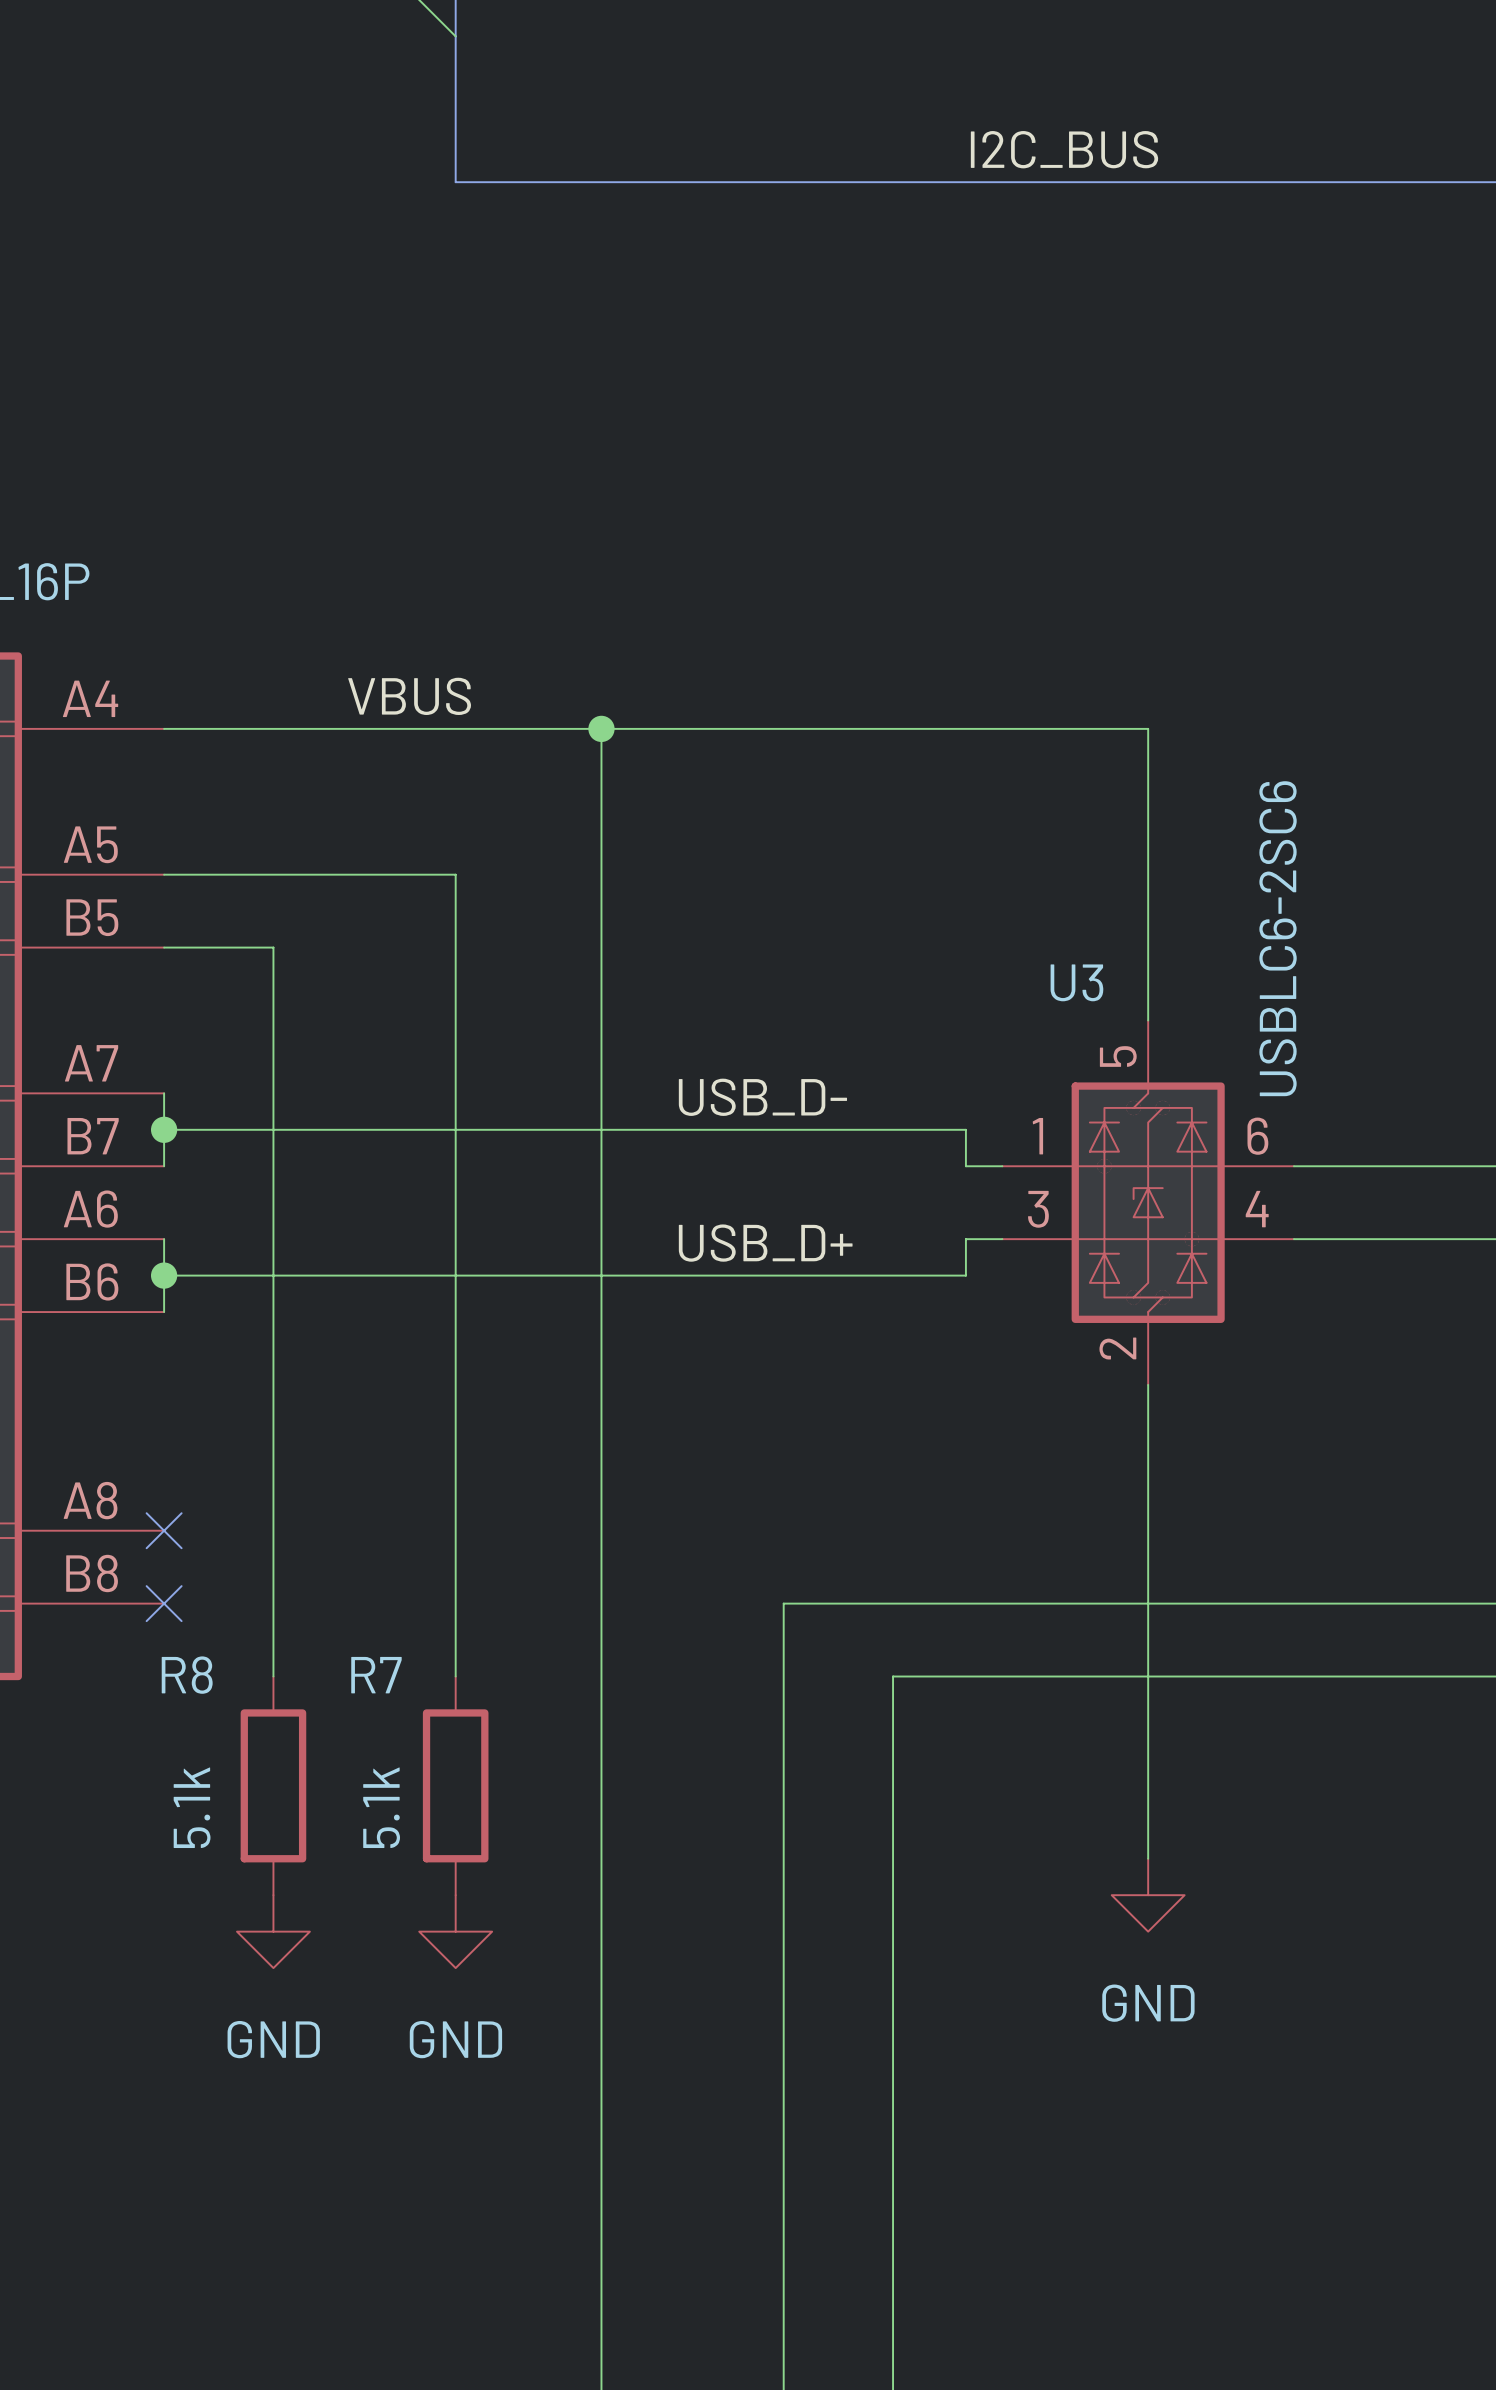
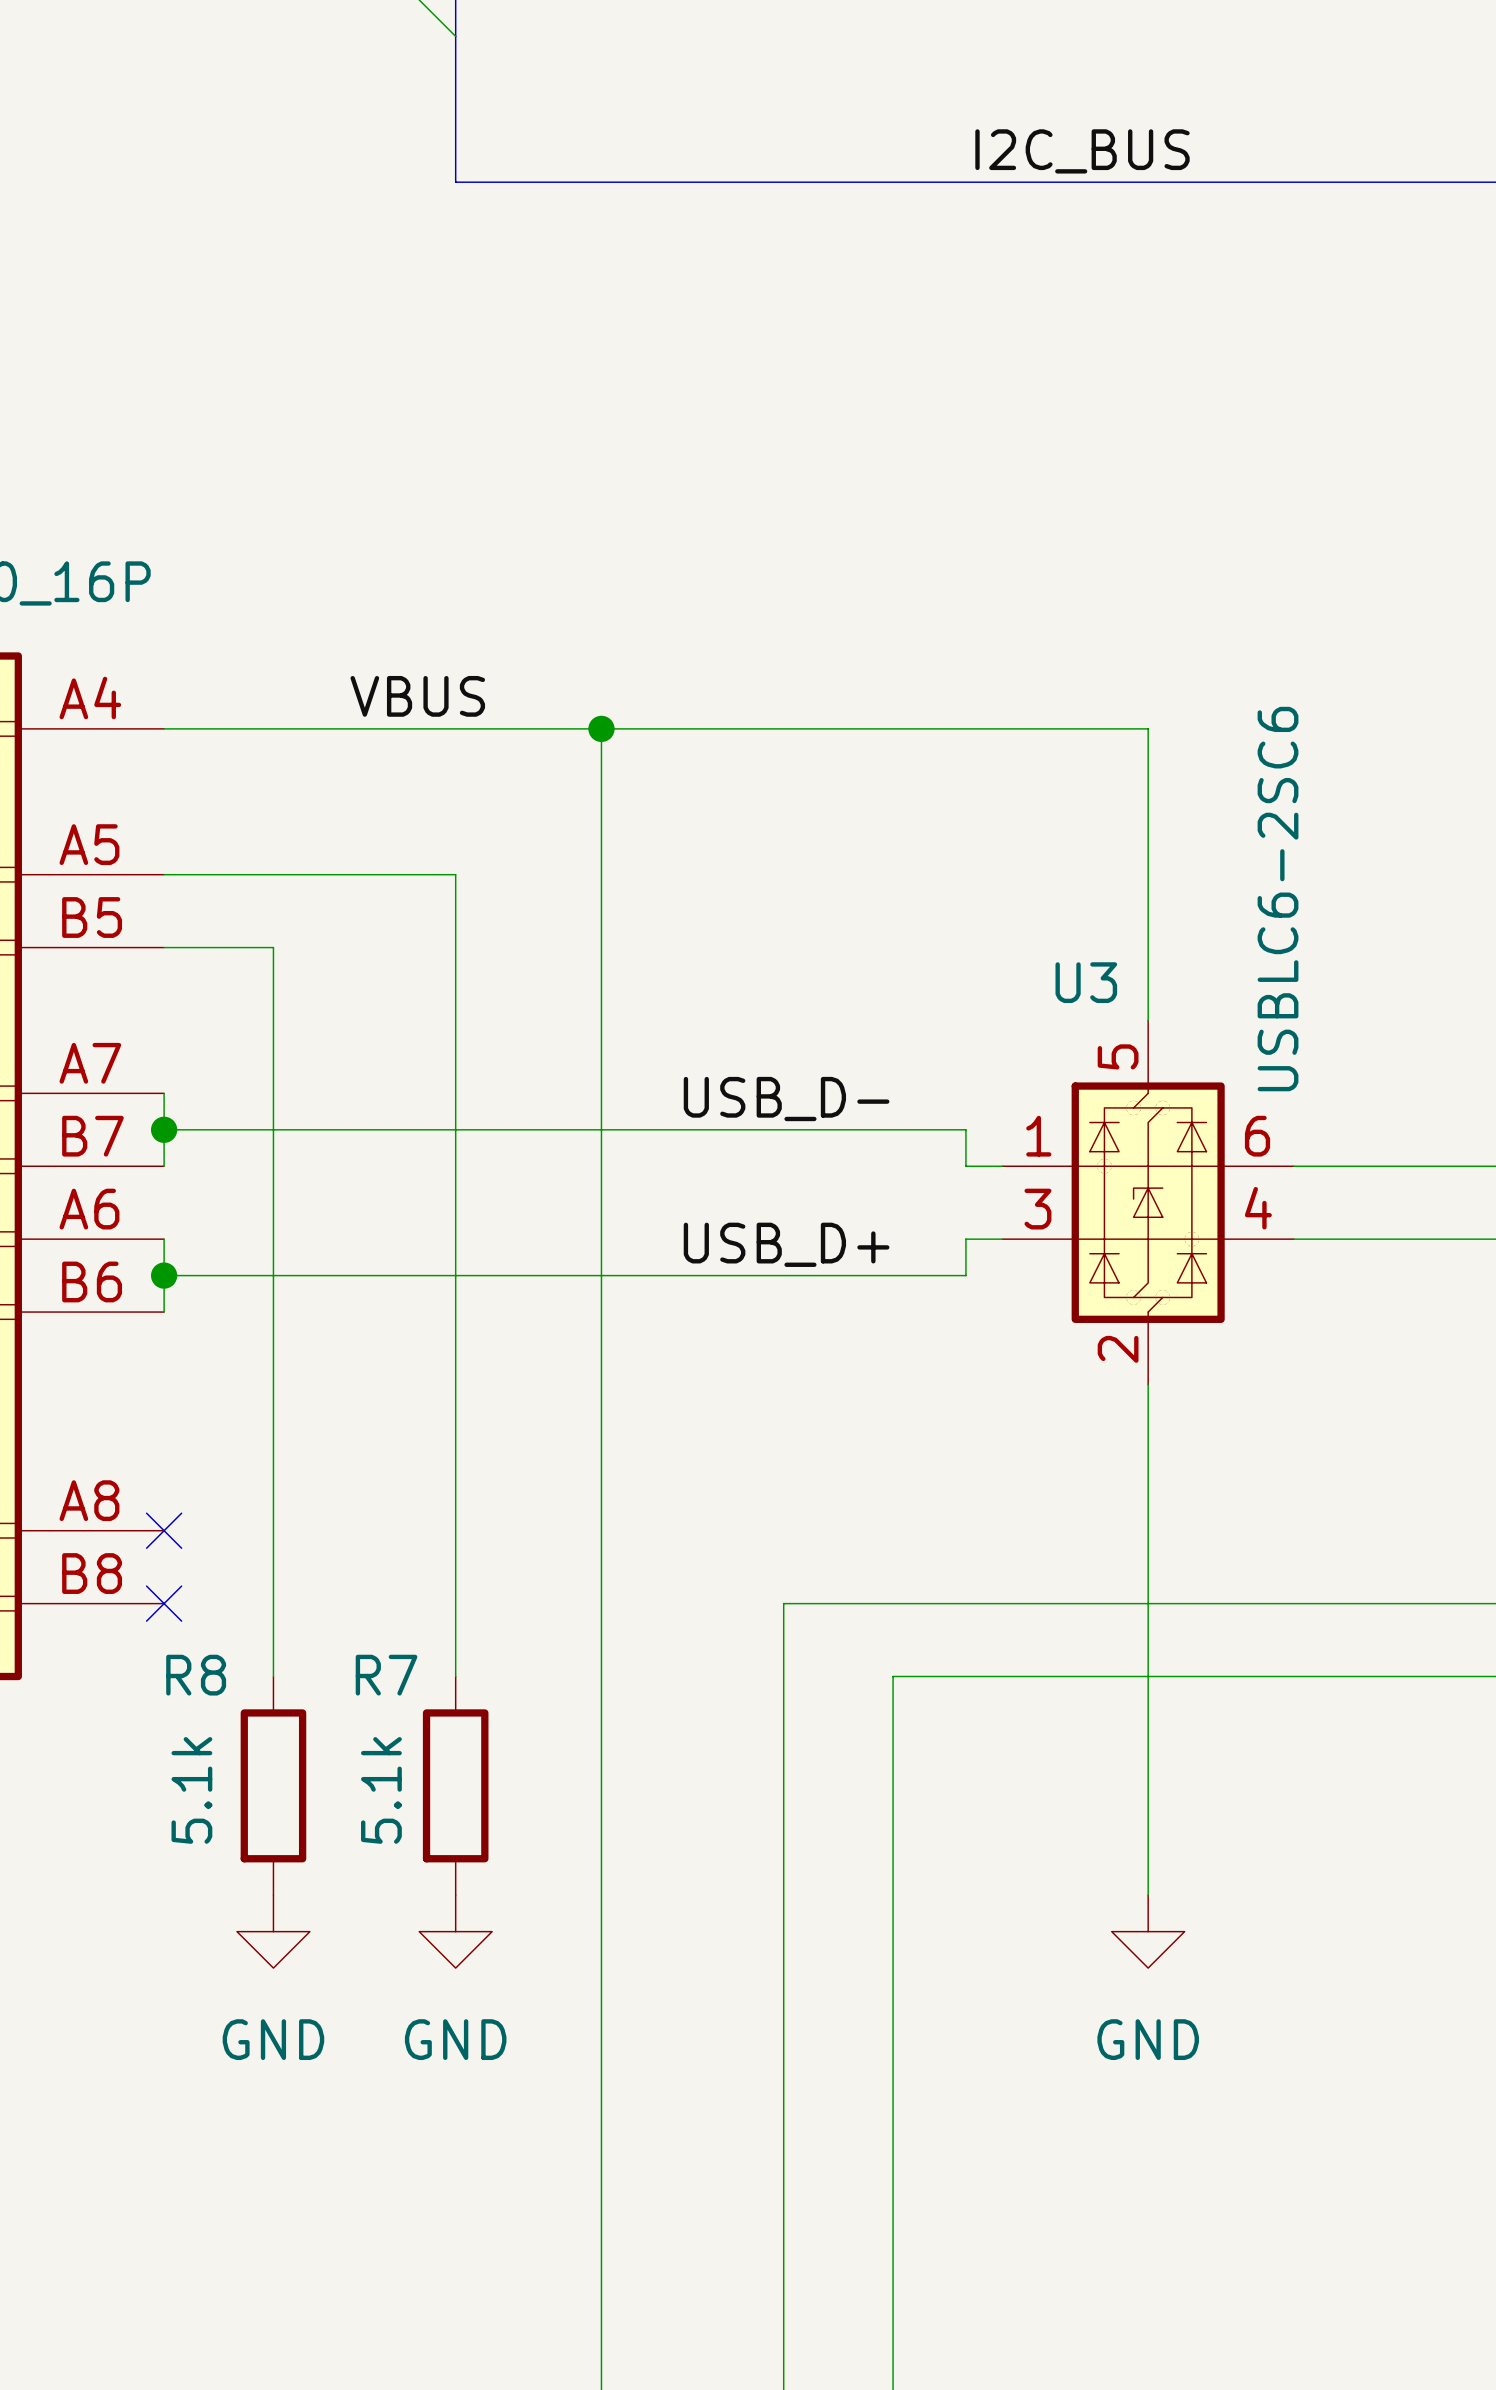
power symbol position: GND (1148, 1895) -> GND (1148, 1931)

